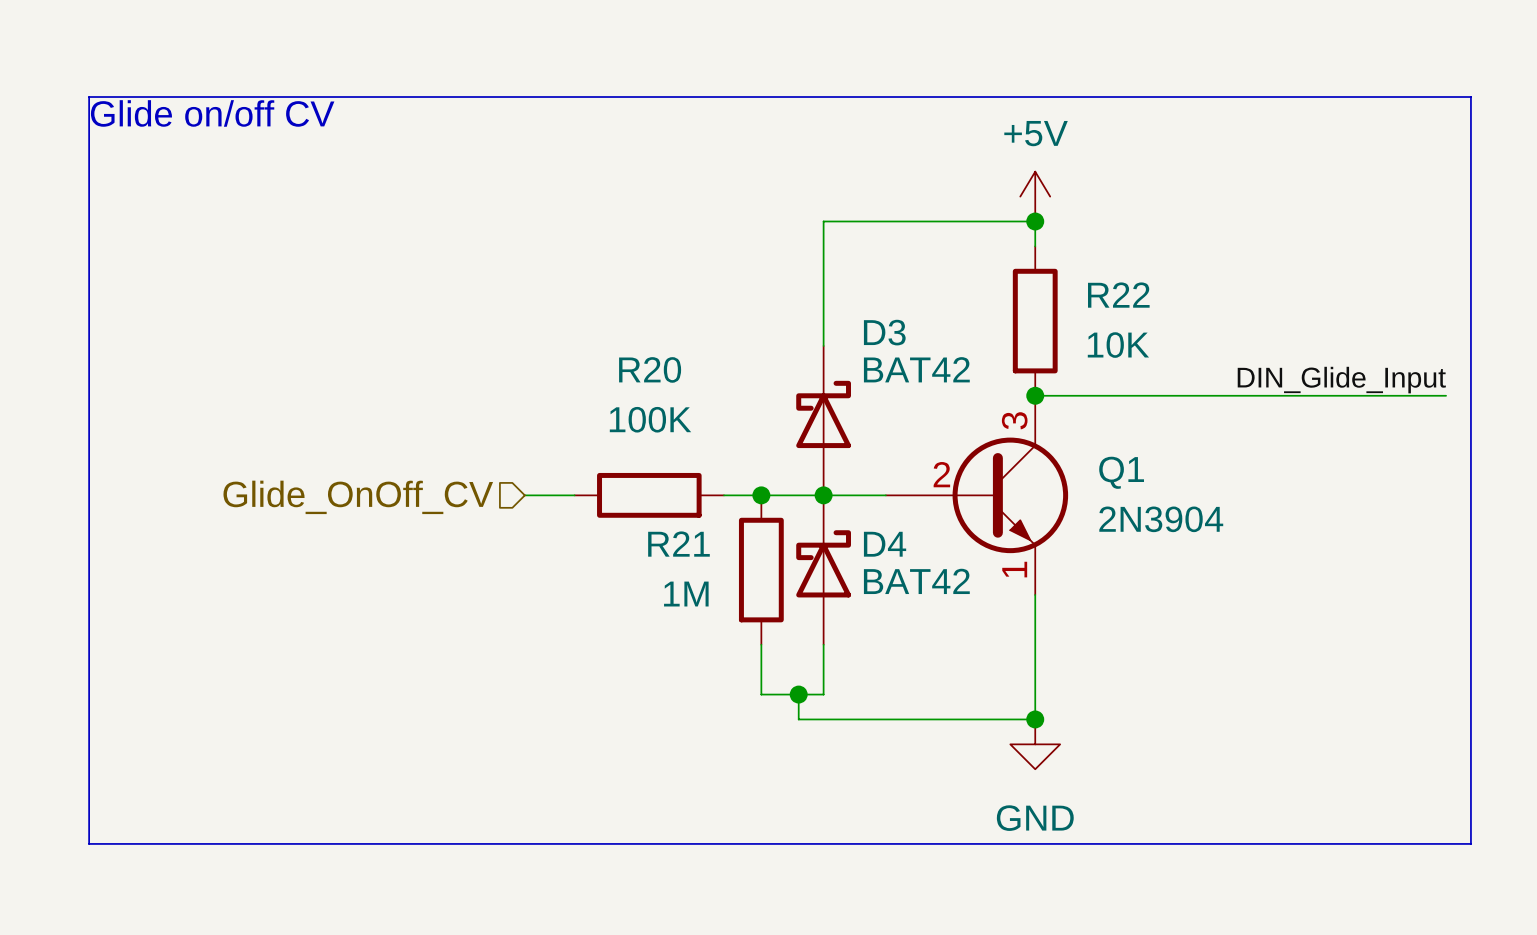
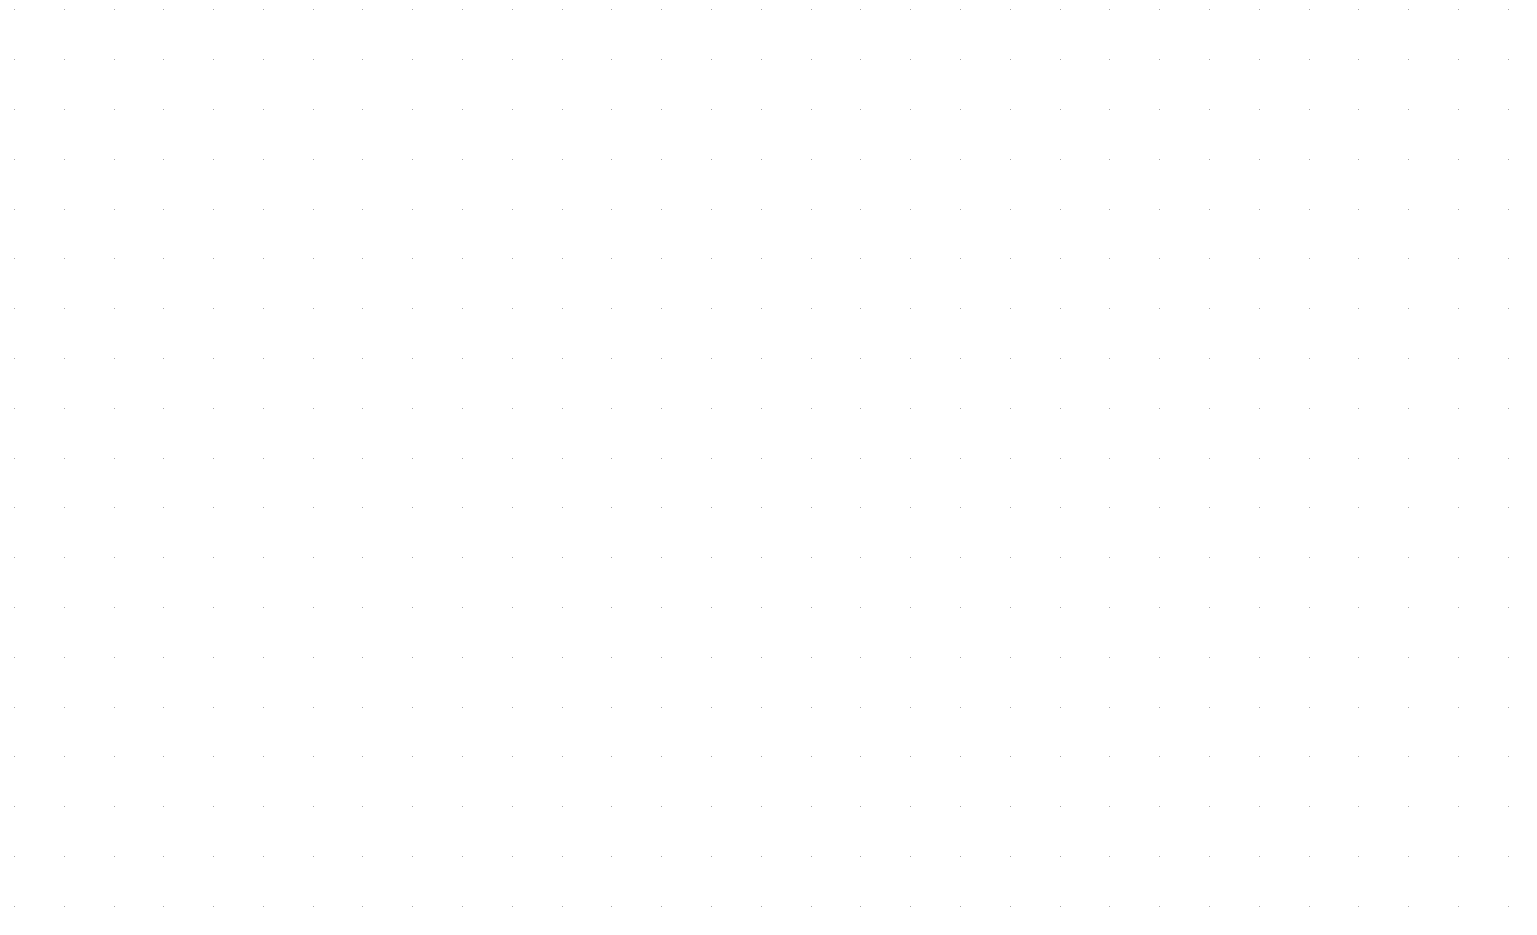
line: (89, 97) (1470, 97) (1470, 843) (89, 843) (89, 97) -> none
text: Glide on/off CV (212, 113) -> none
power symbol: +5V (1035, 196) -> none
junction: (1035, 221) -> none
wire: (1035, 246) (1035, 221) (823, 221) (823, 345) -> none
R22: 10K (1035, 321) -> none
label: DIN_Glide_Input (1341, 380) -> none
wire: (1035, 395) (1446, 395) -> none
junction: (1035, 395) -> none
D3: BAT42 (823, 420) -> none
wire: (524, 495) (574, 495) -> none
R20: 100K (649, 495) -> none
wire: (724, 495) (885, 495) -> none
junction: (761, 495) -> none
junction: (823, 495) -> none
Q1: 2N3904 (976, 495) -> none
hierarchical label: Glide_OnOff_CV (358, 497) -> none
R21: 1M (761, 570) -> none
D4: BAT42 (823, 570) -> none
wire: (1035, 594) (1035, 719) (798, 719) (798, 694) -> none
wire: (761, 644) (761, 694) (823, 694) (823, 644) -> none
junction: (798, 694) -> none
junction: (1035, 719) -> none
power symbol: GND (1035, 744) -> none

